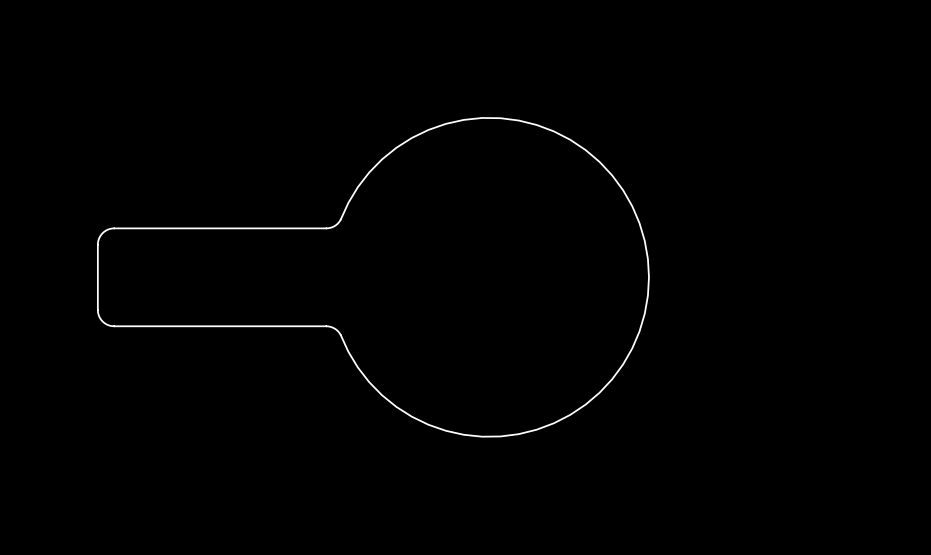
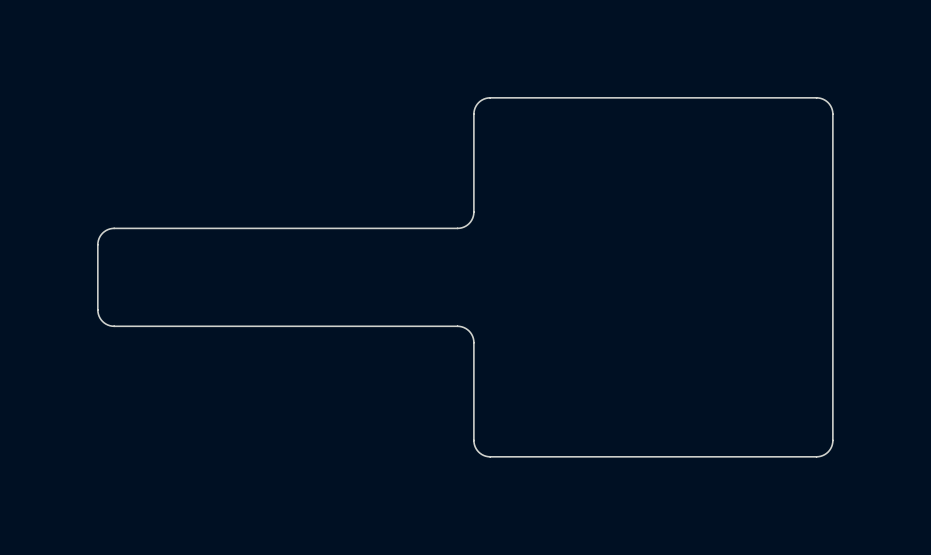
board edge: (326, 228) (333, 226) (338, 222) (357, 187) (369, 172) (382, 159) (411, 137) (445, 123) (463, 119) (500, 118) (518, 120) (553, 131) (570, 139) (585, 150) (612, 175) (632, 206) (639, 223) (647, 258) (648, 277) (647, 295) (639, 331) (623, 364) (612, 379) (585, 404) (570, 414) (536, 429) (518, 434) (482, 436) (463, 434) (428, 424) (411, 416) (382, 395) (369, 382) (357, 367) (338, 332) (333, 327) (326, 326) -> (326, 228) (457, 228) (467, 225) (471, 220) (473, 212) (474, 112) (478, 102) (485, 98) (816, 97) (826, 101) (832, 109) (832, 440) (829, 450) (822, 455) (485, 456) (478, 452) (474, 442) (473, 342) (471, 334) (467, 329) (457, 326) (326, 326)

